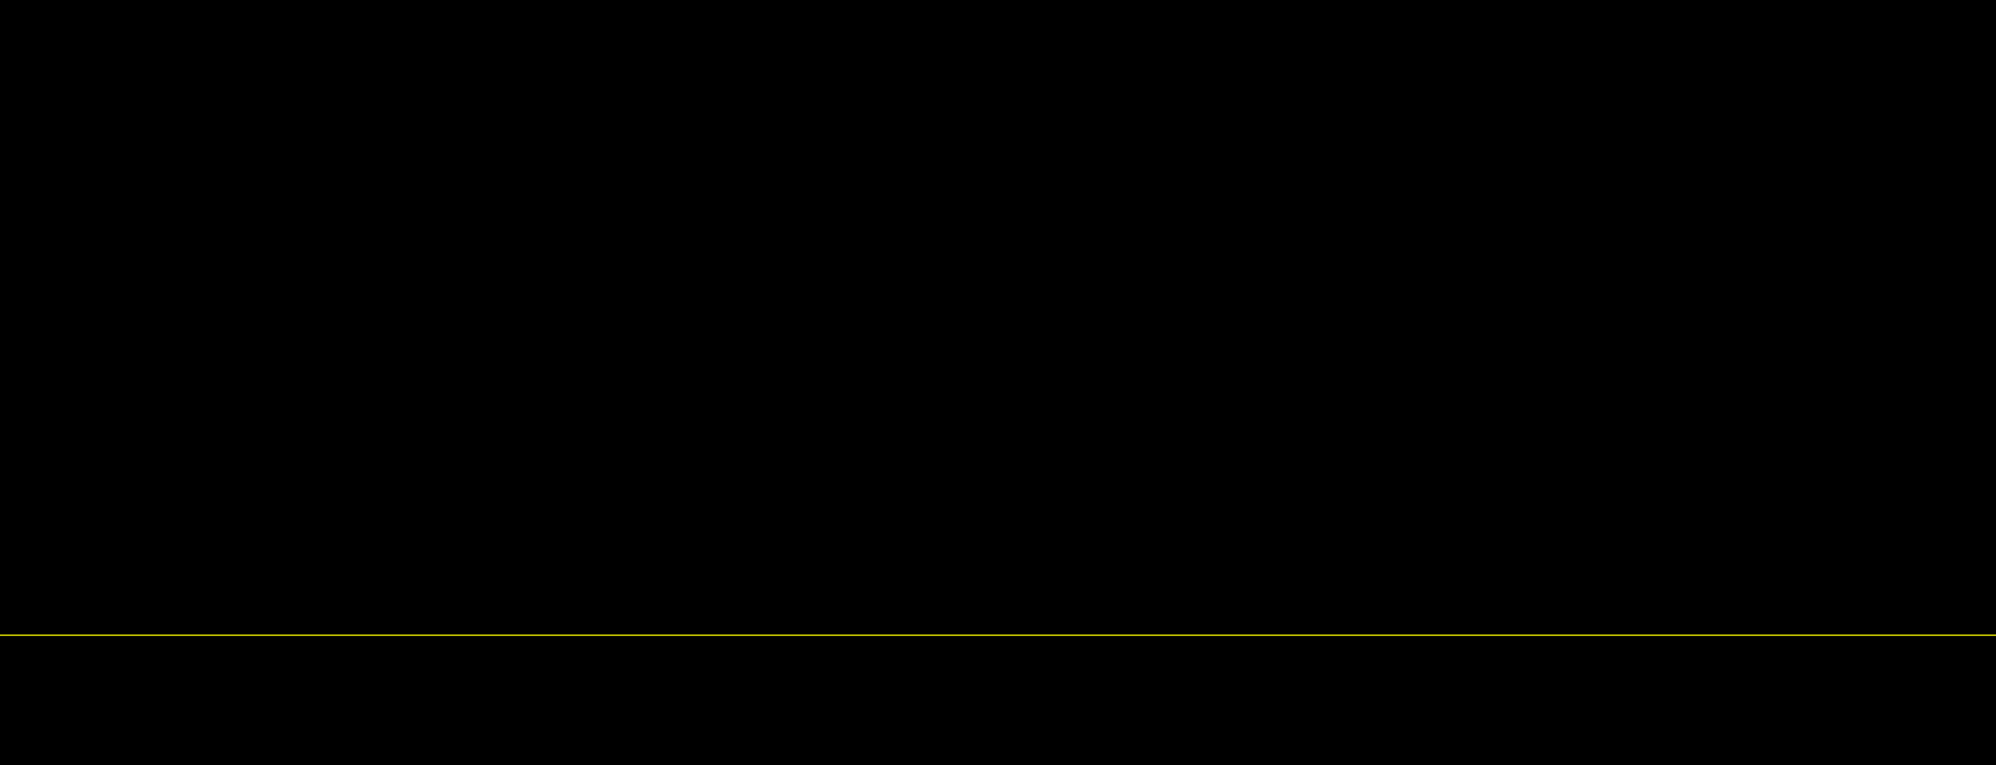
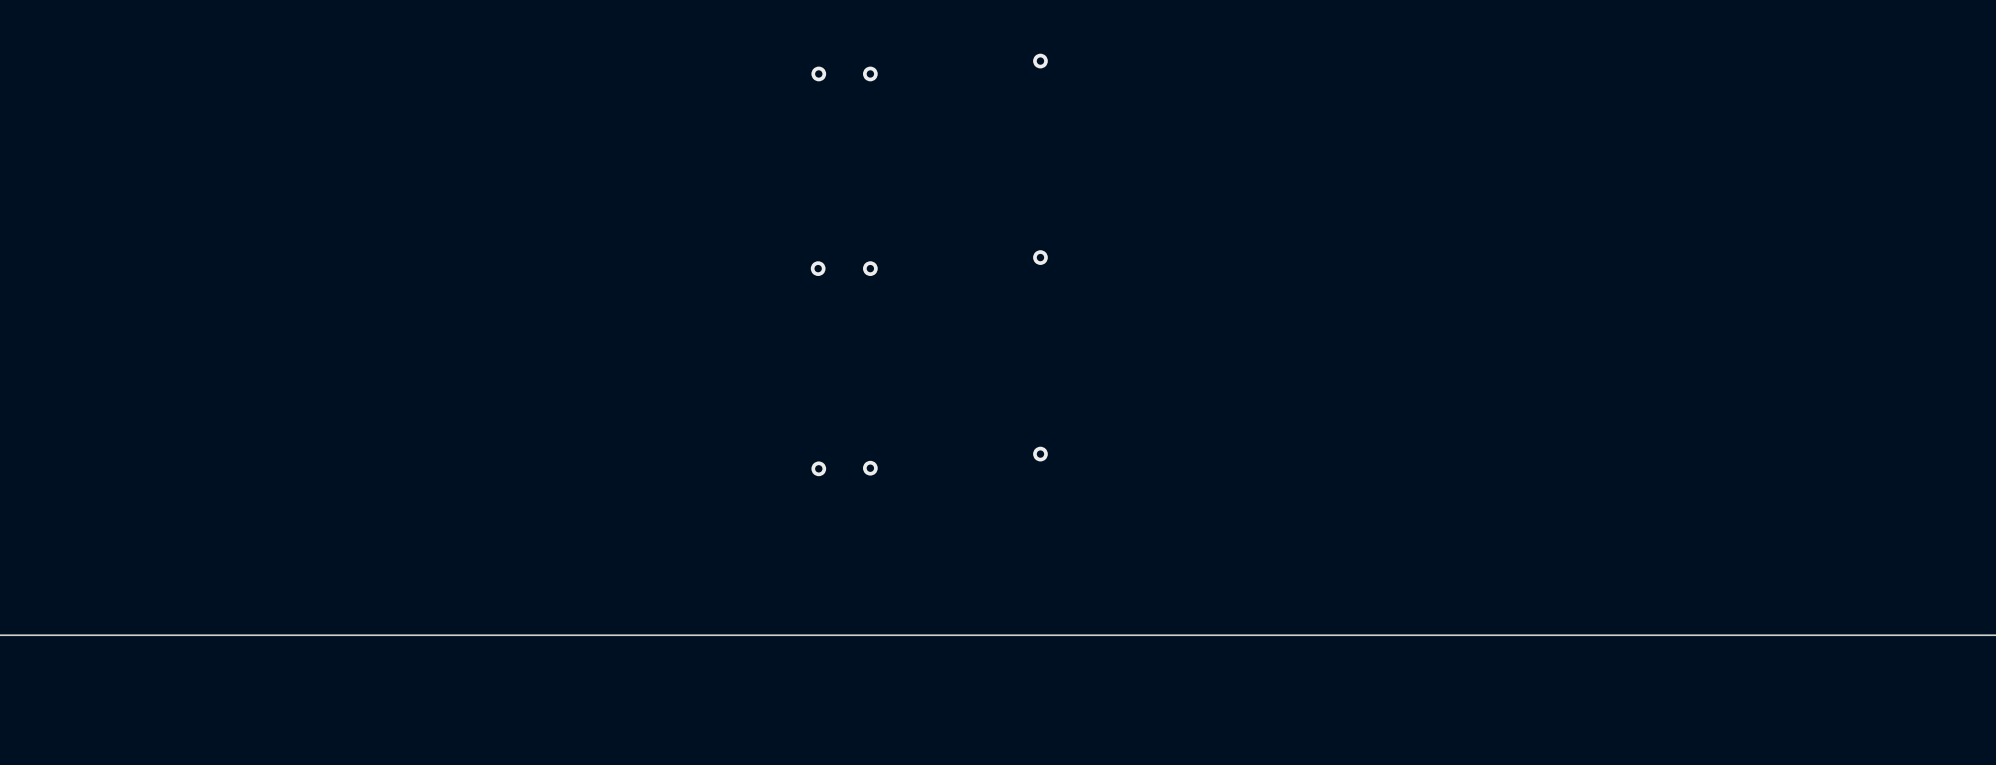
via: none -> (1040, 61)
via: none -> (818, 73)
via: none -> (870, 73)
via: none -> (1040, 257)
via: none -> (818, 268)
via: none -> (870, 268)
via: none -> (1040, 454)
via: none -> (818, 468)
via: none -> (870, 468)

